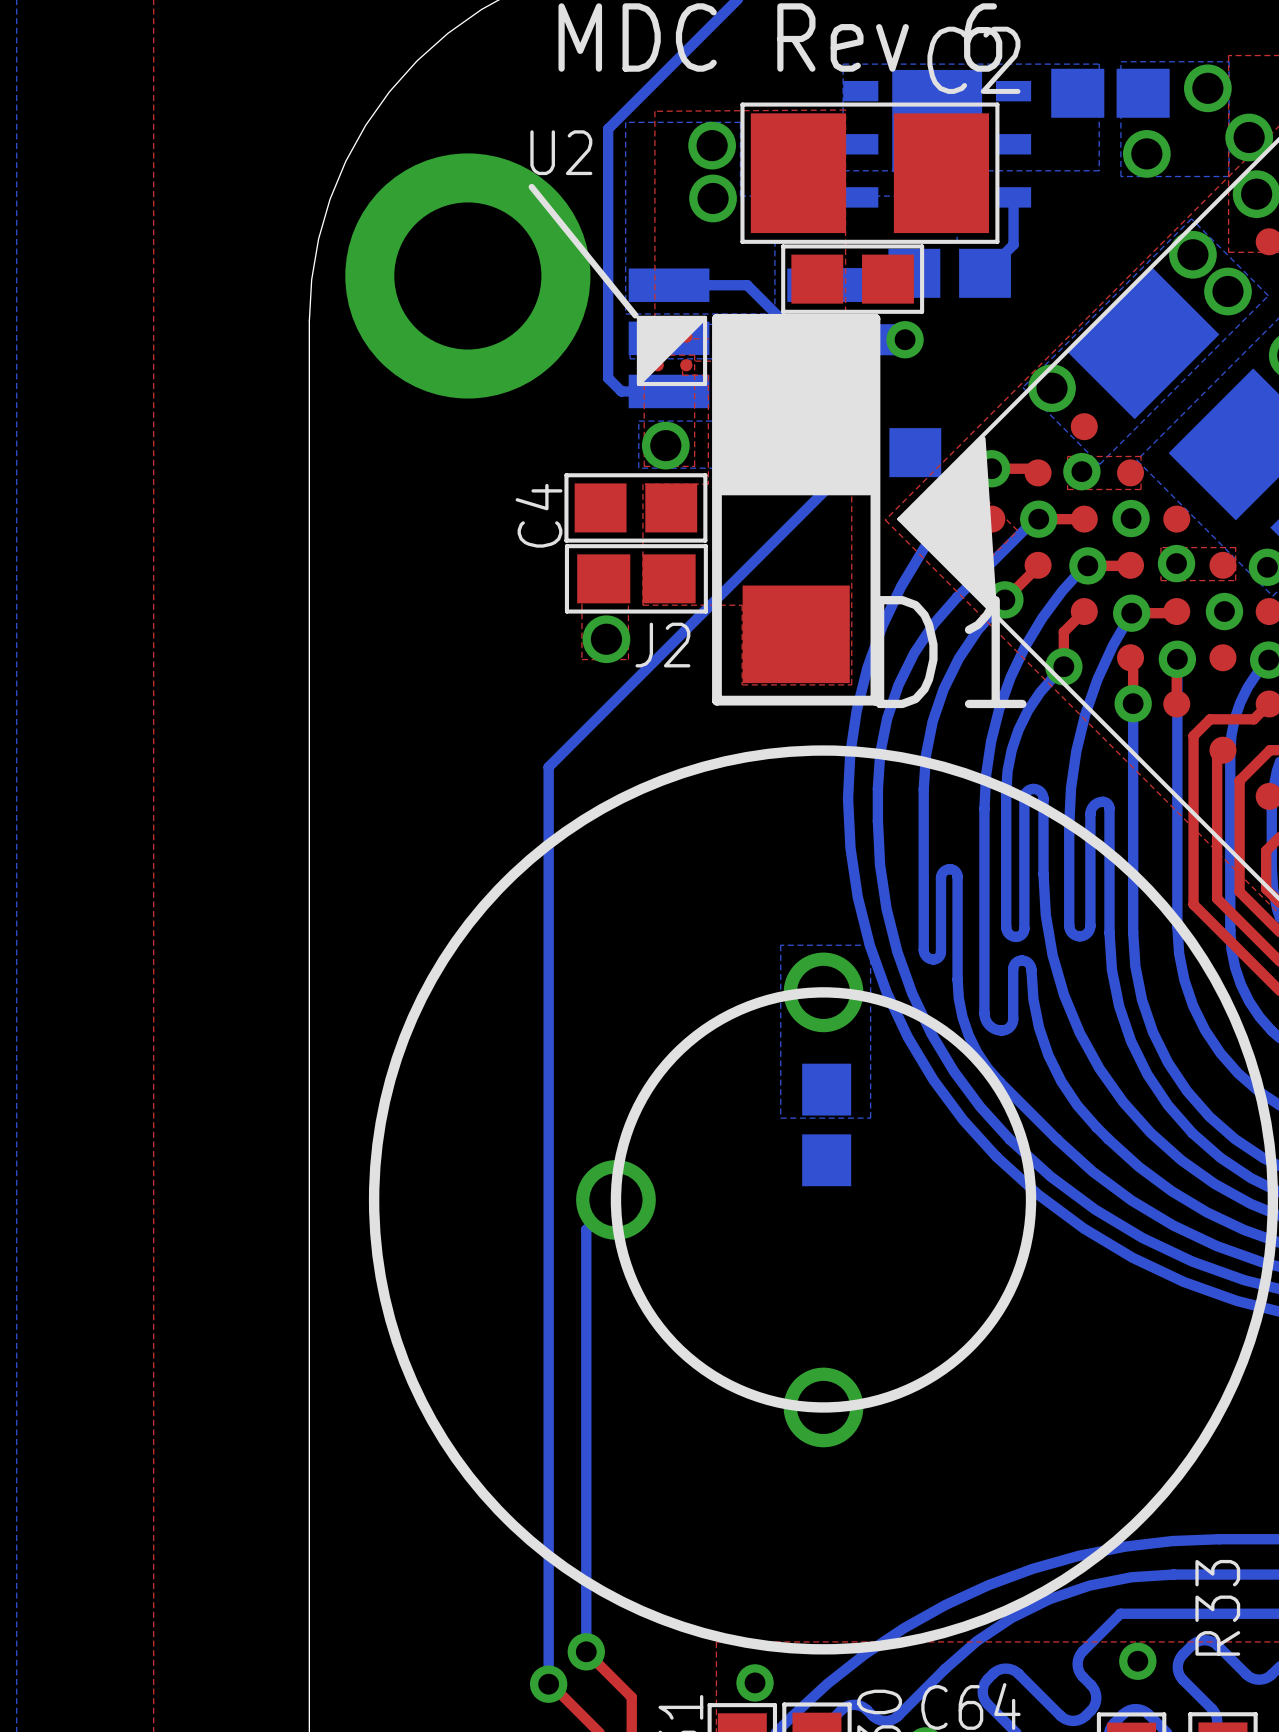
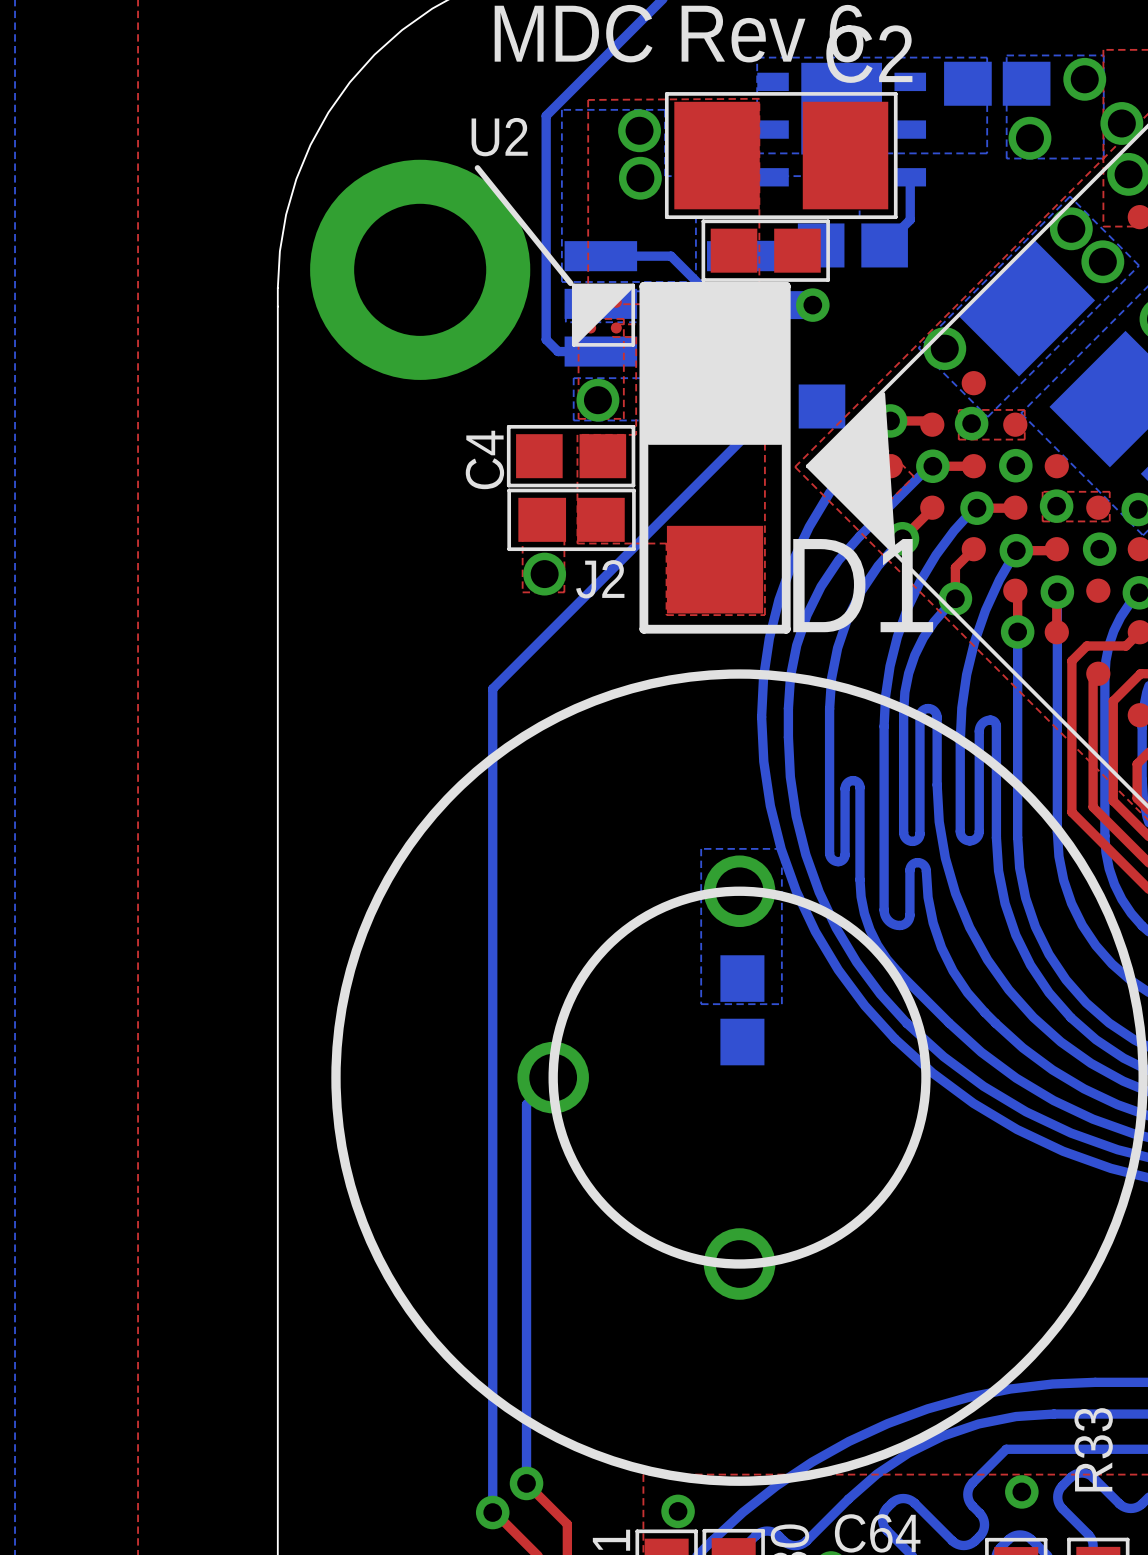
via position: (467, 275) -> (420, 269)

